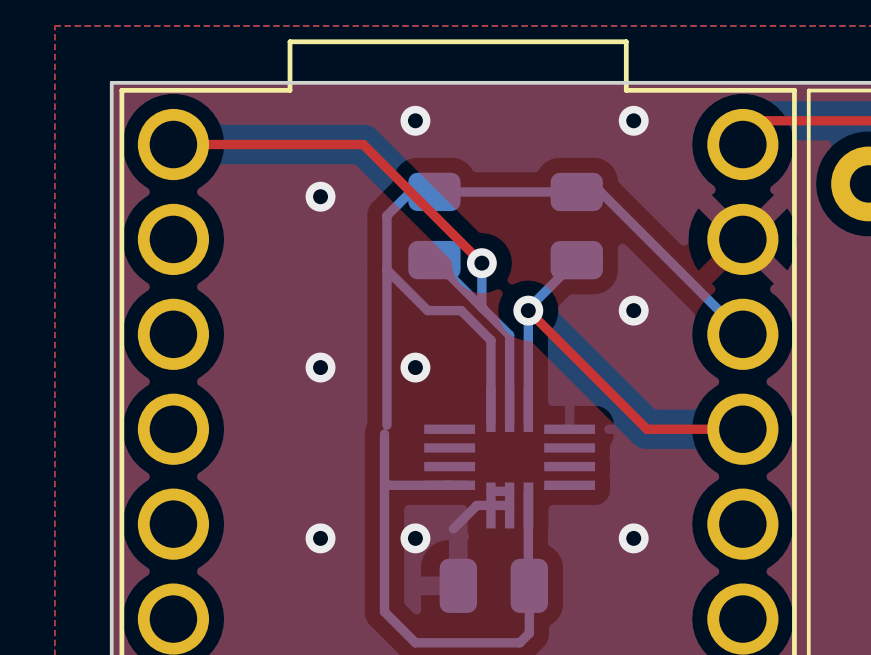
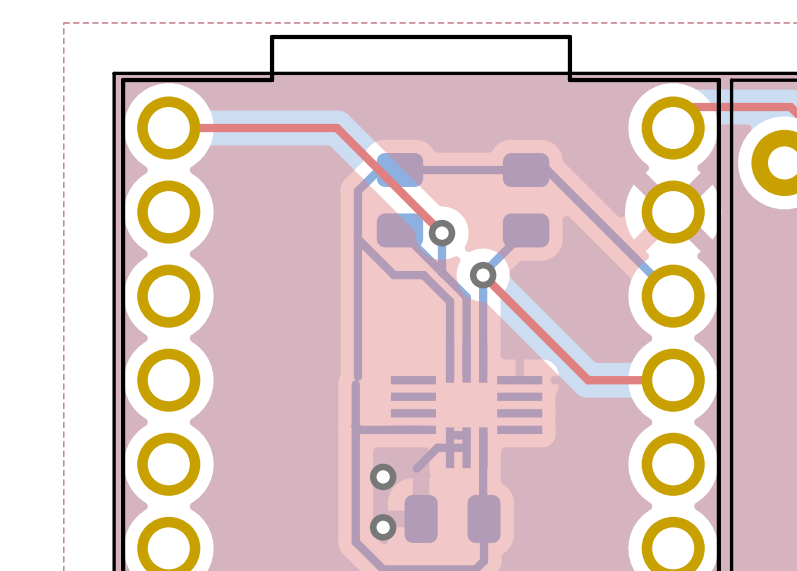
via: (415, 120) -> none
via: (633, 120) -> none
via: (320, 196) -> none
via: (633, 310) -> none
via: (320, 367) -> none
via: (415, 367) -> none
via: (320, 538) -> none
via: (633, 538) -> none
via: none -> (383, 527)

